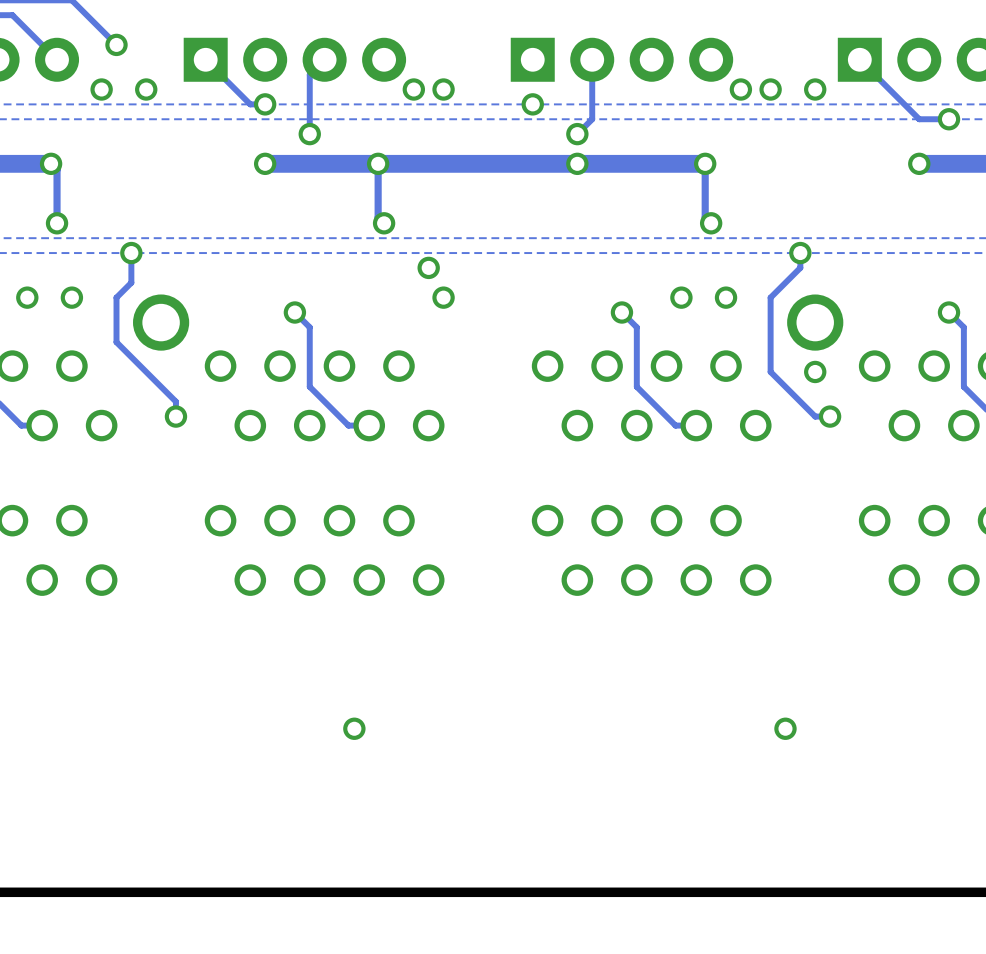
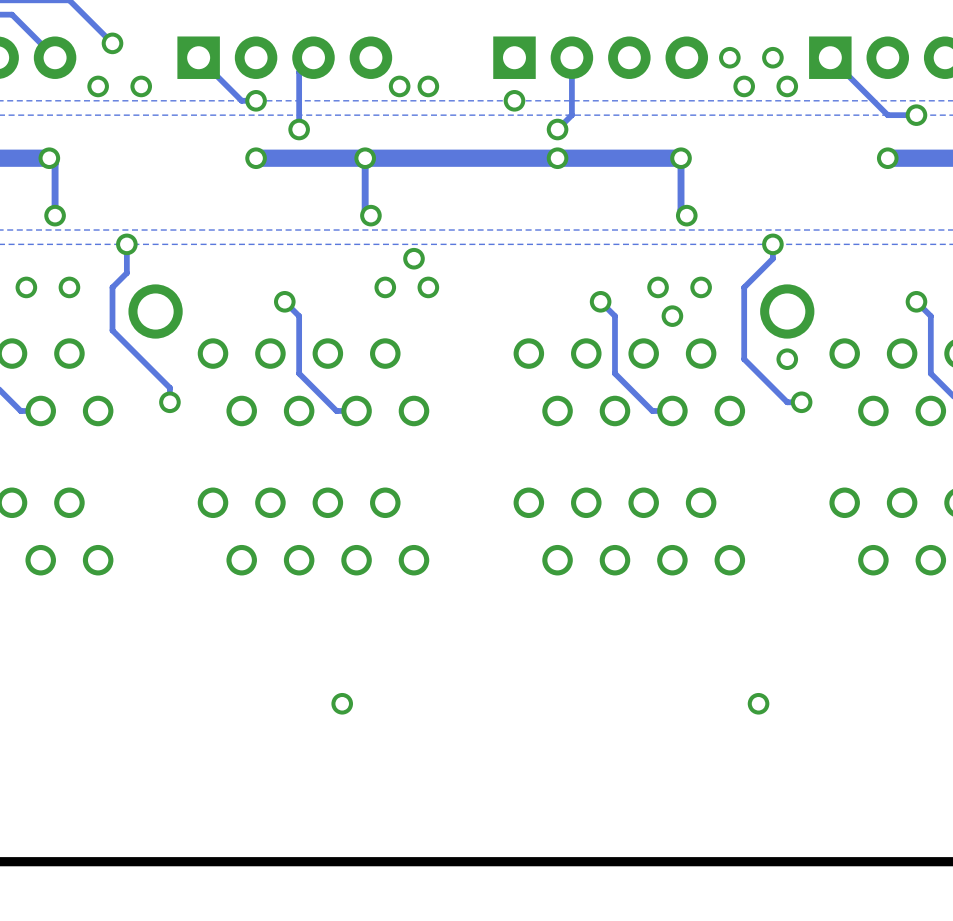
via: none -> (729, 57)
via: none -> (772, 57)
via: (740, 89) -> none
via: none -> (385, 287)
via: none -> (672, 316)

